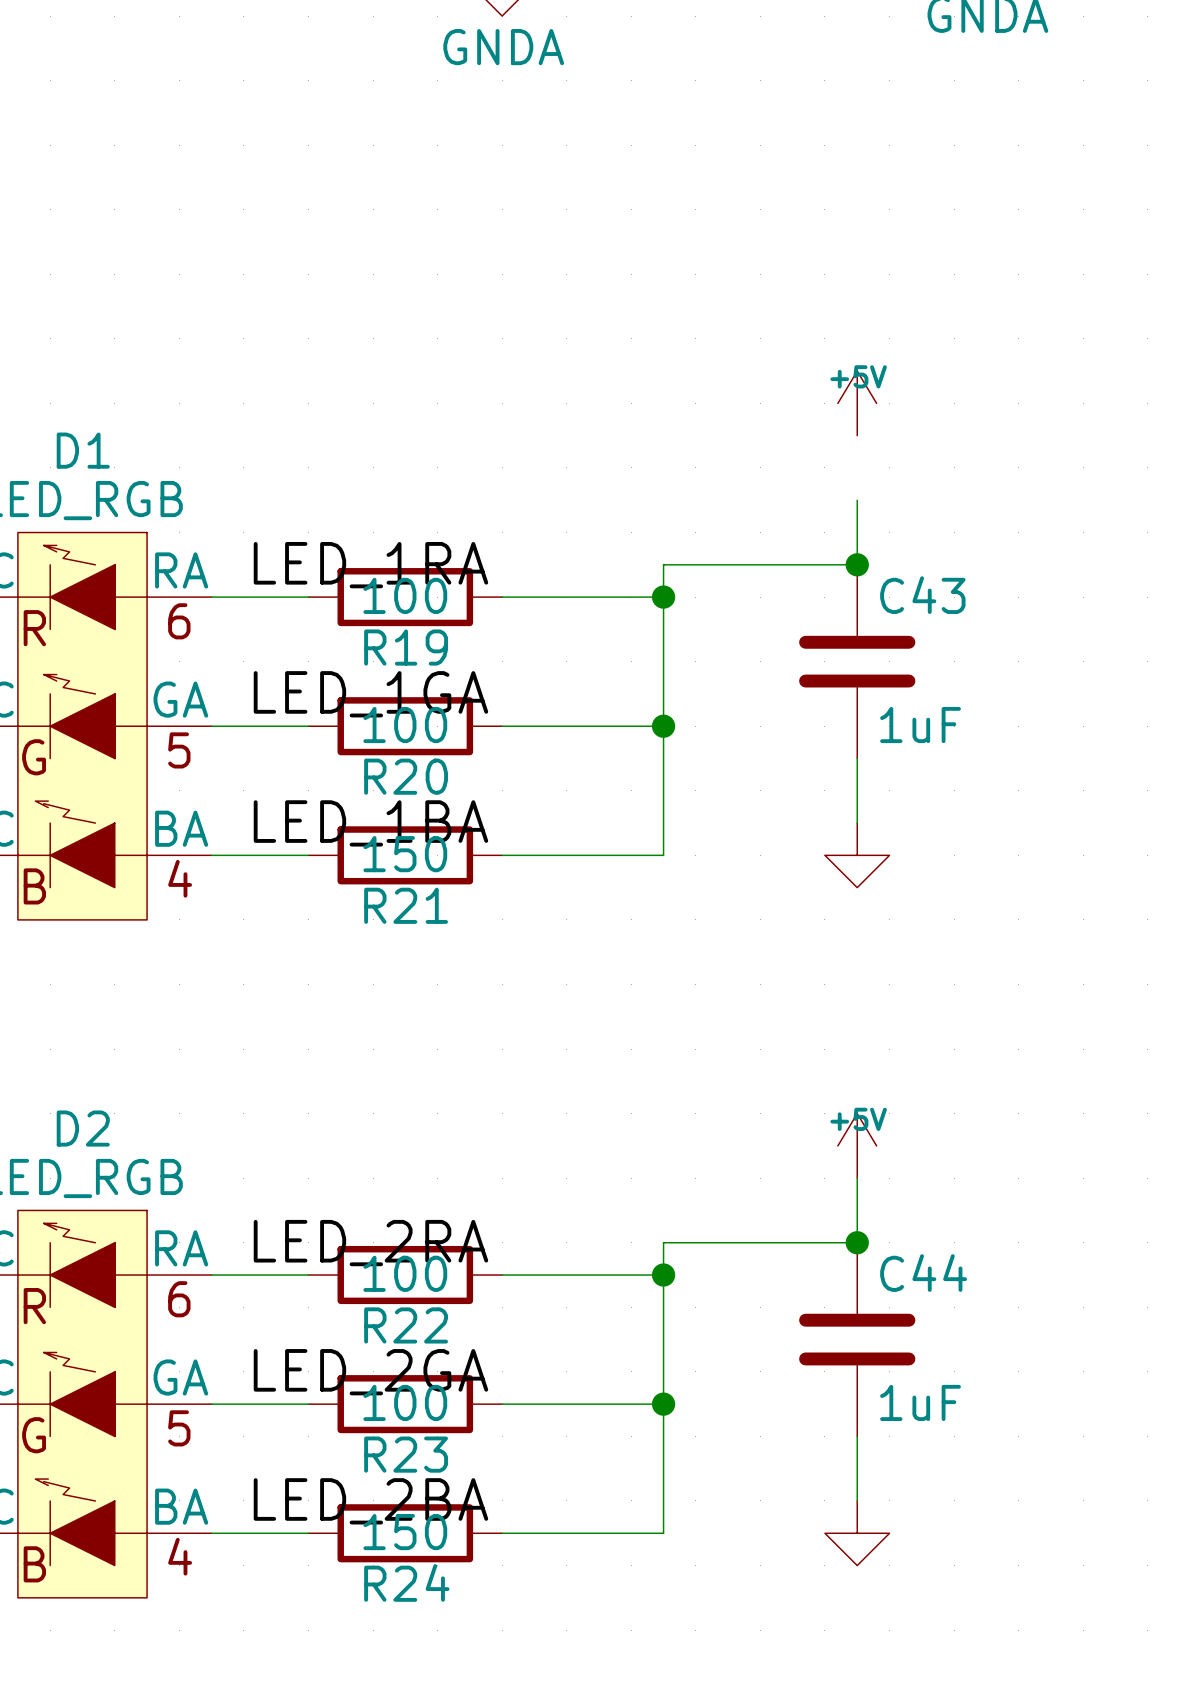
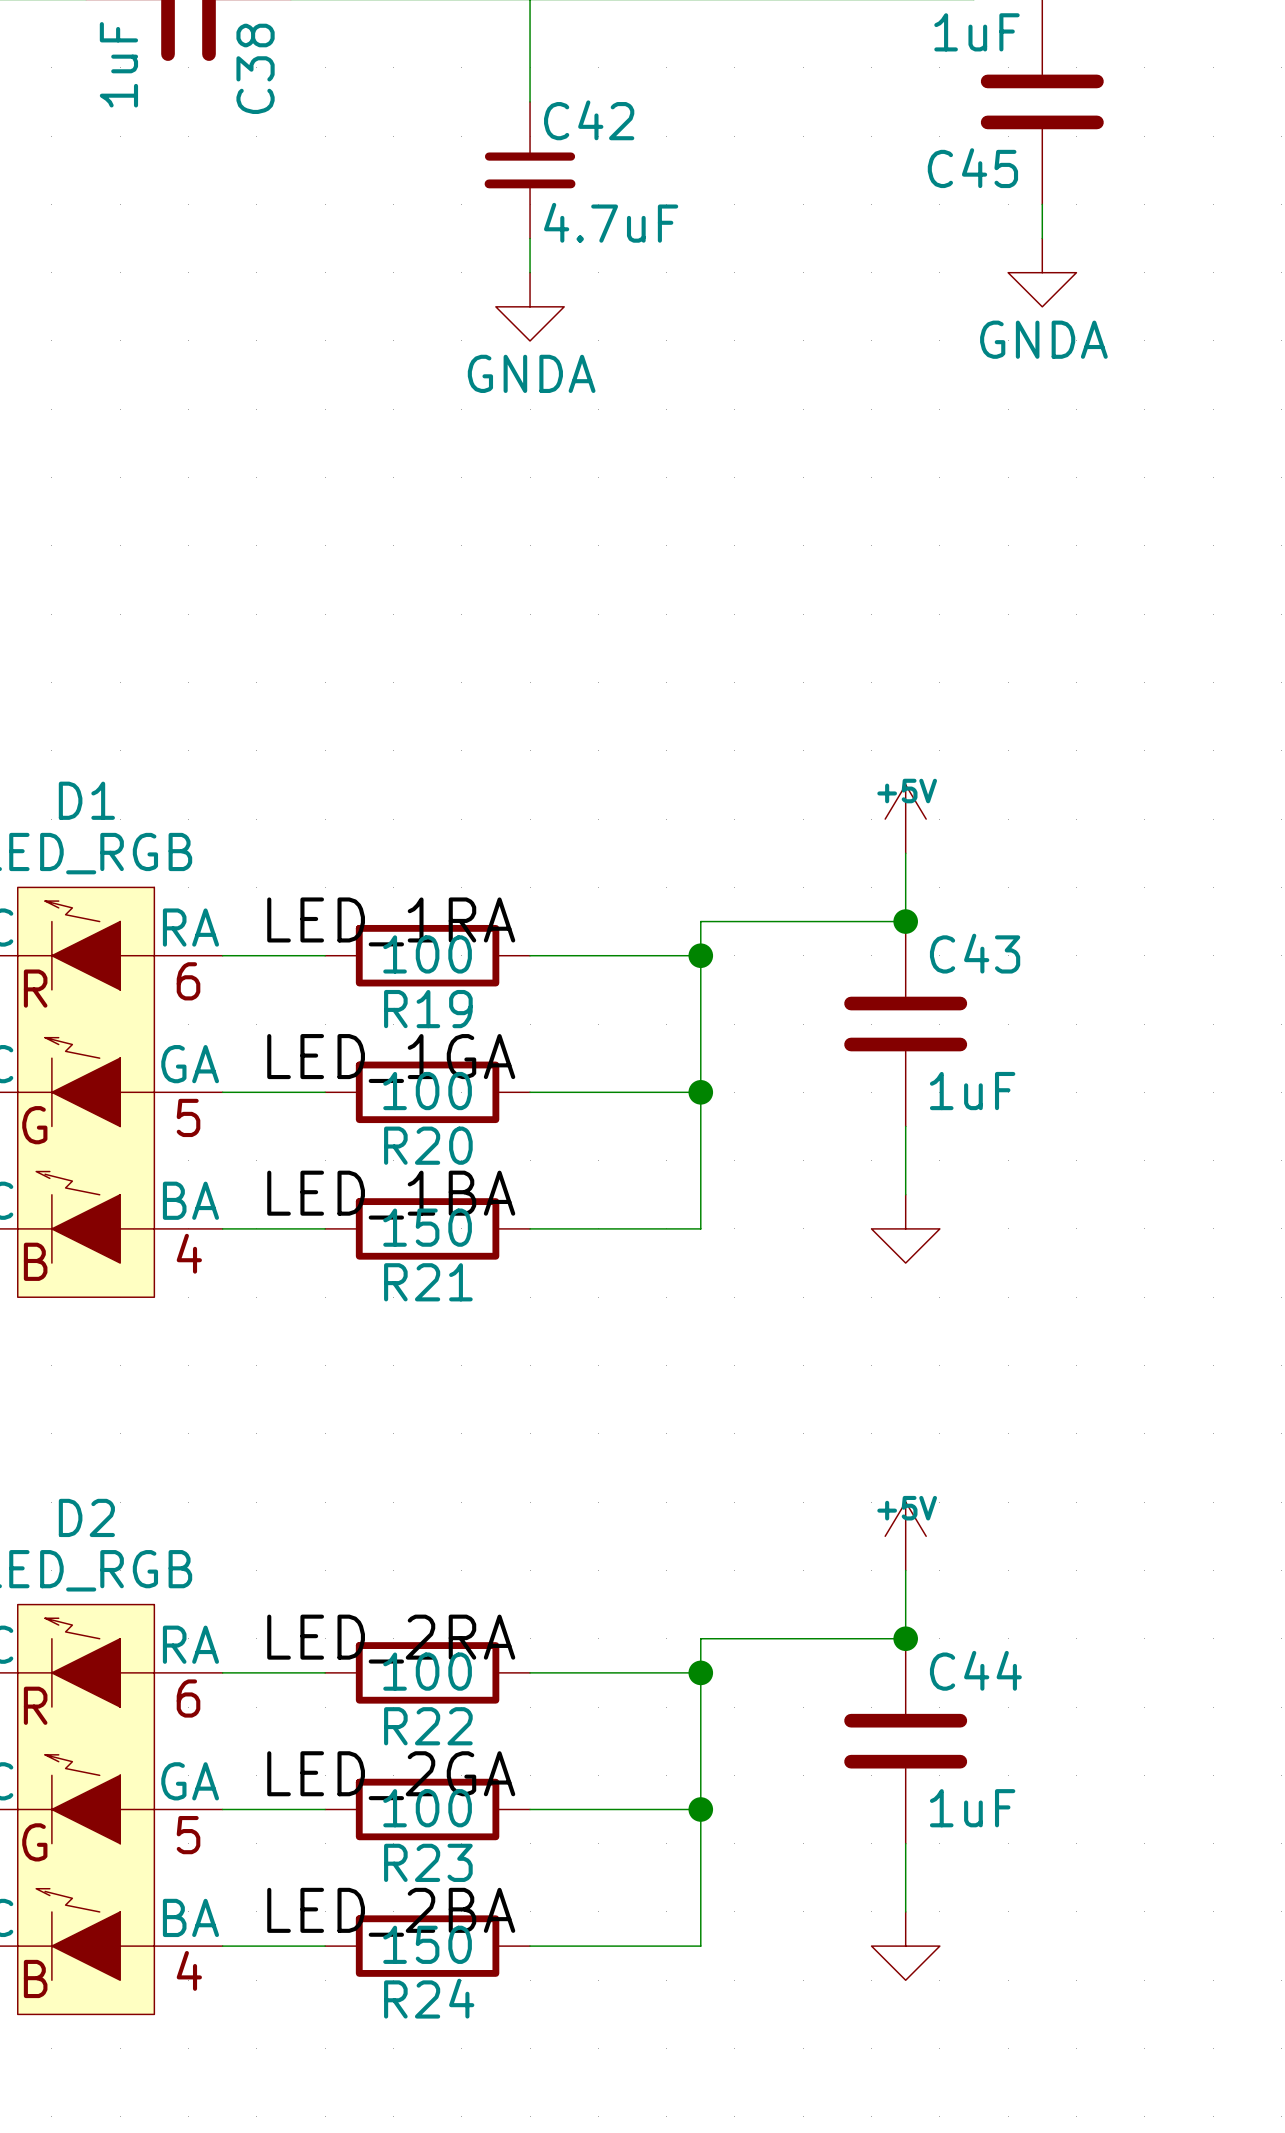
power symbol position: +5V (857, 403) -> +5V (905, 819)

